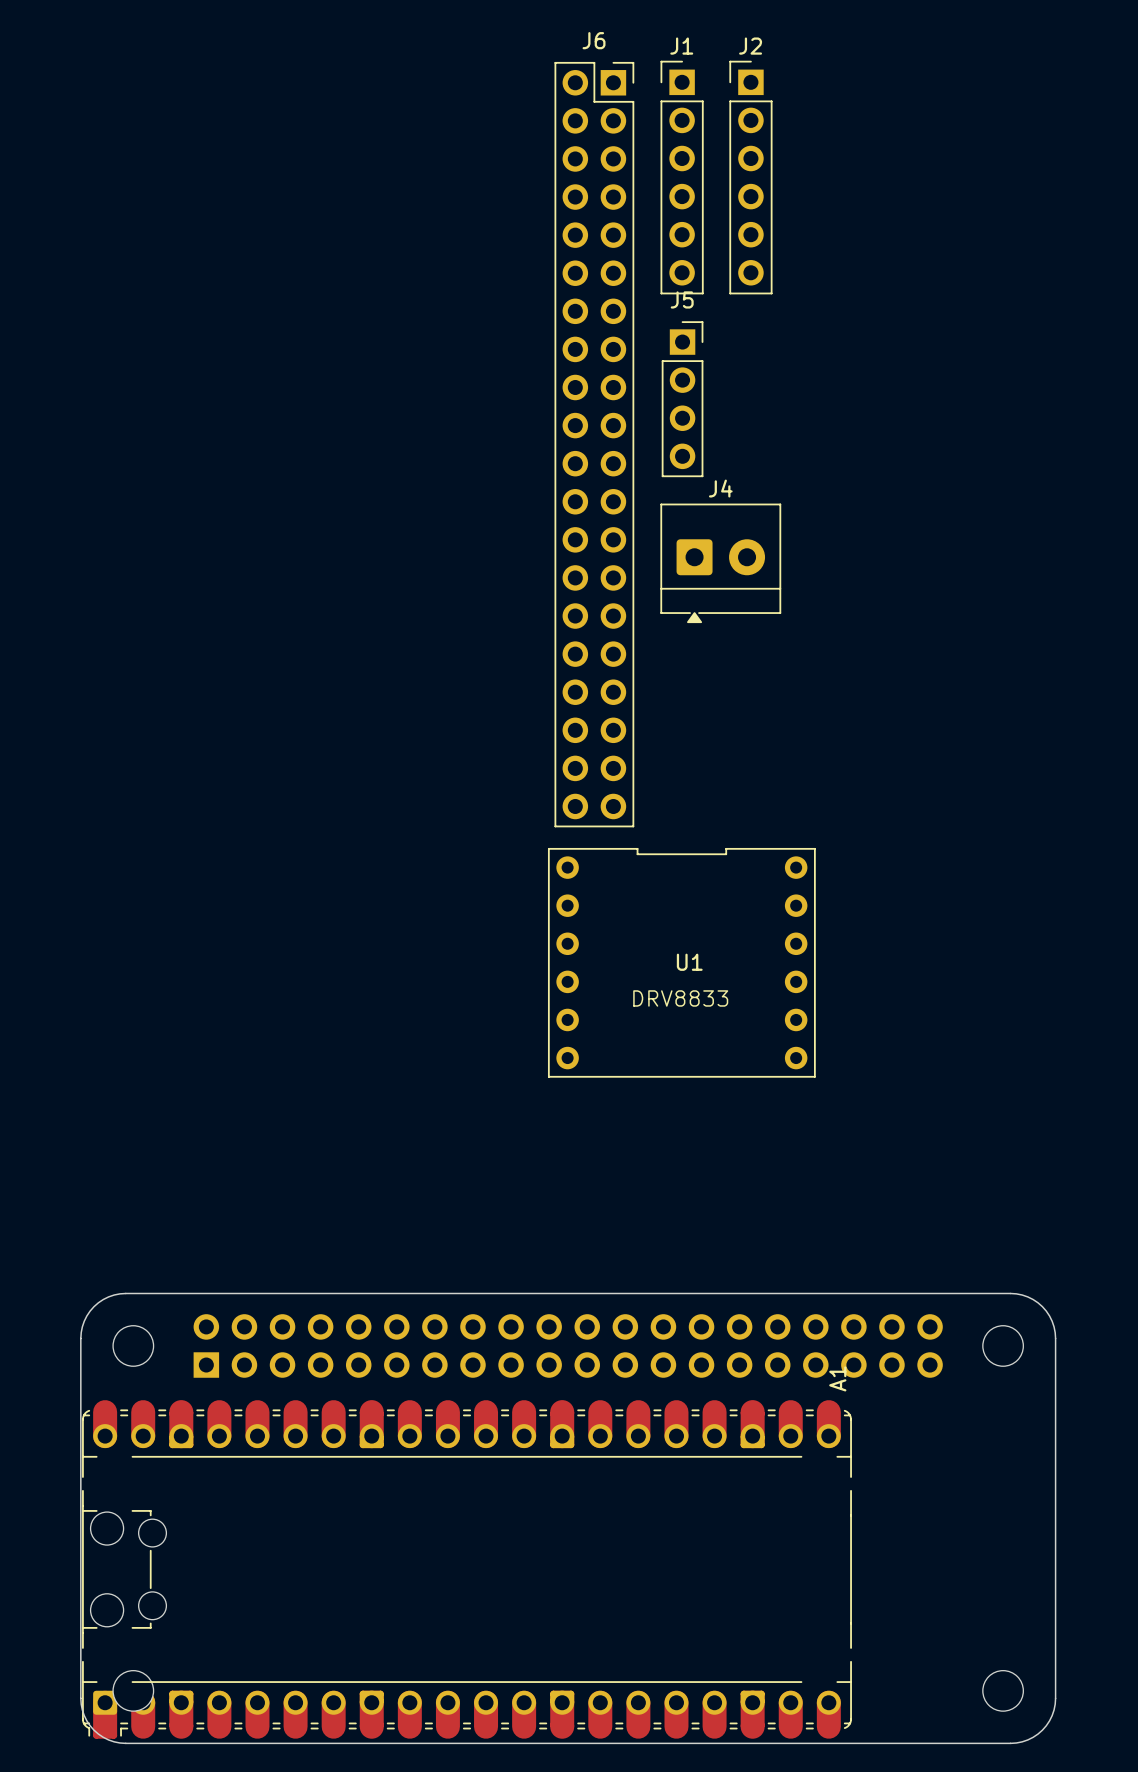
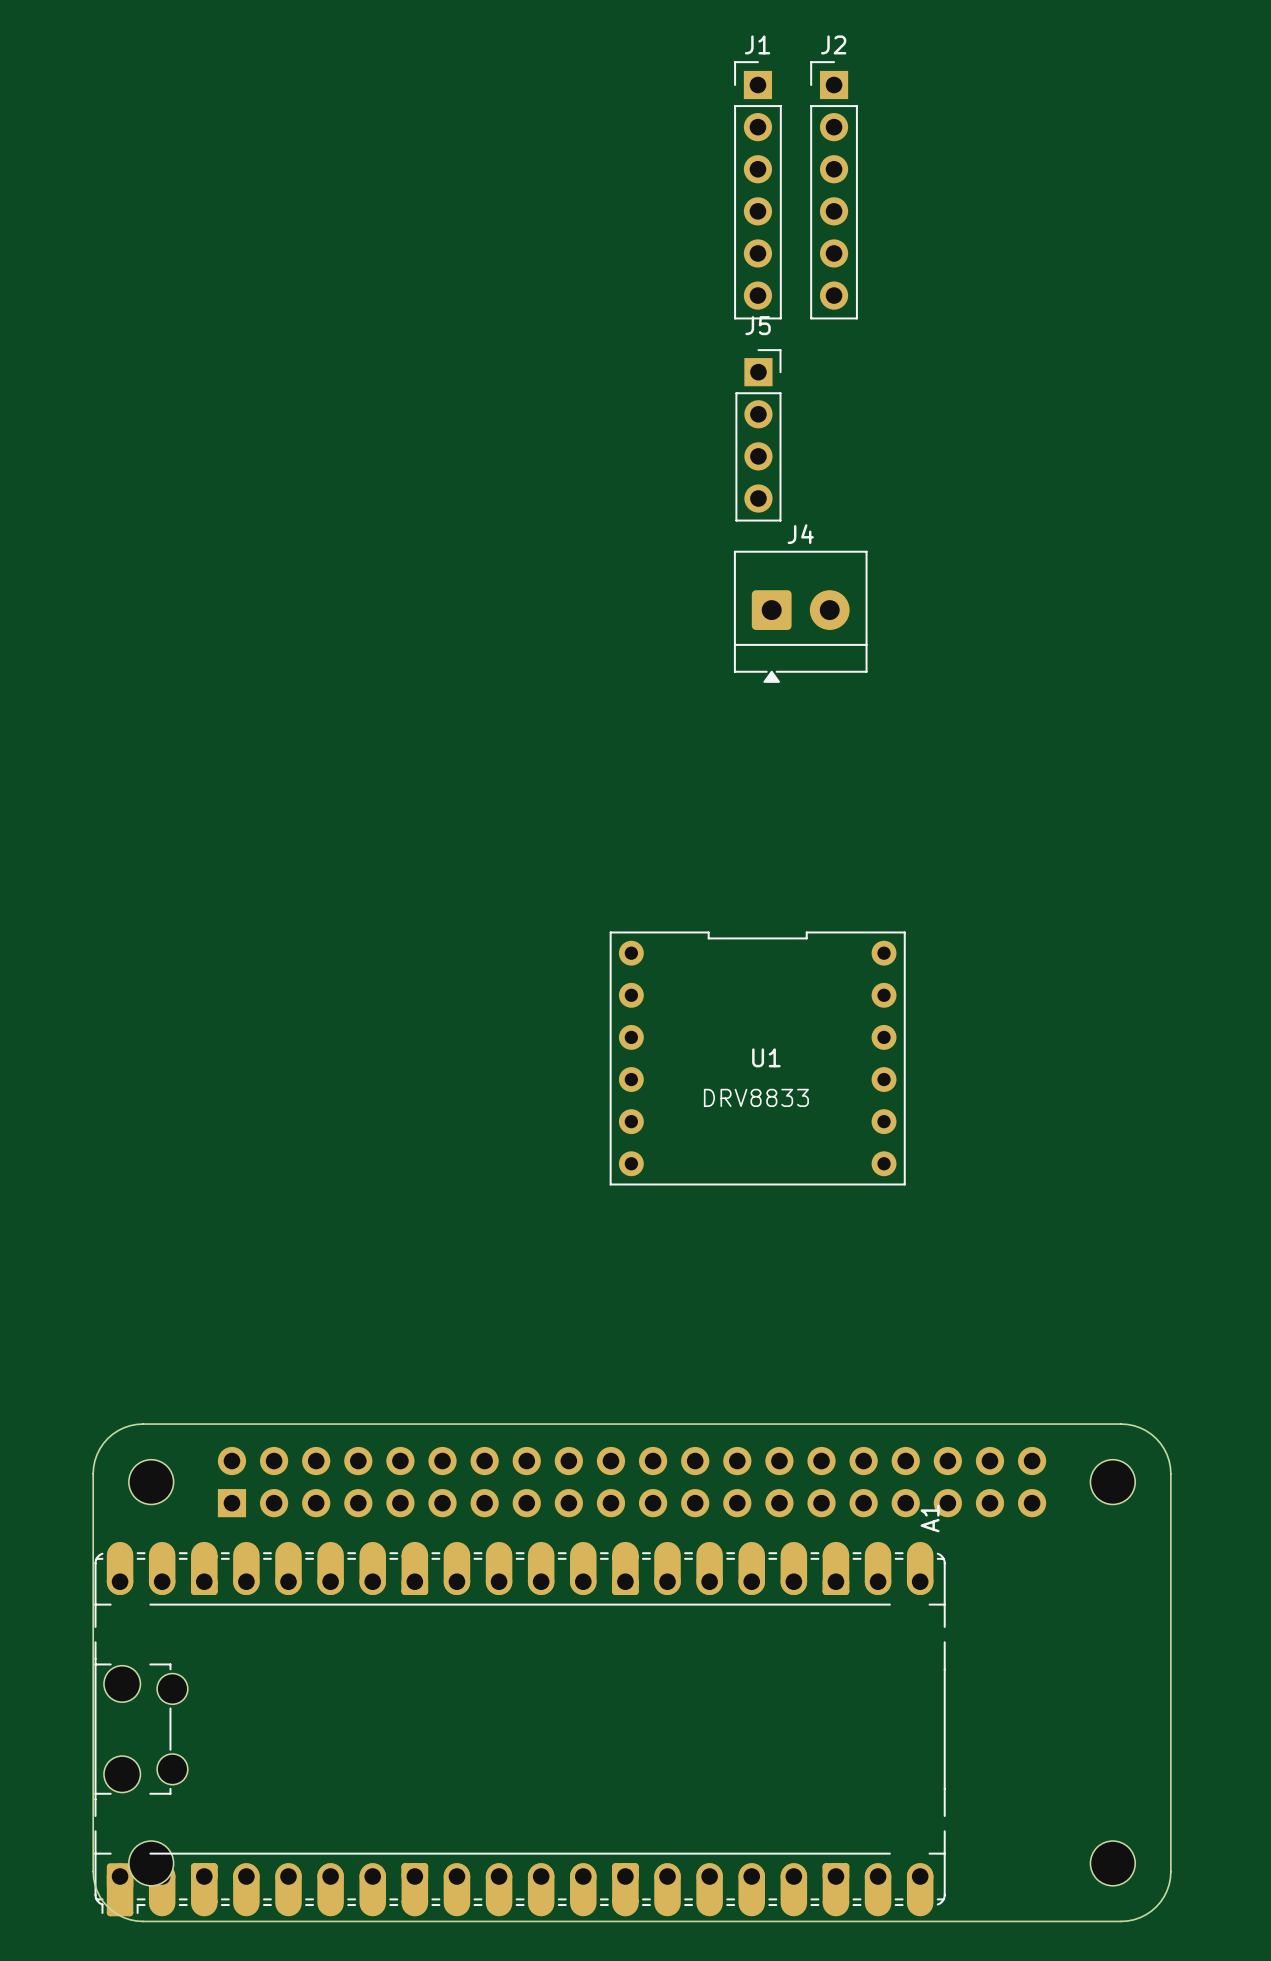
J6: (594, 444) -> none

